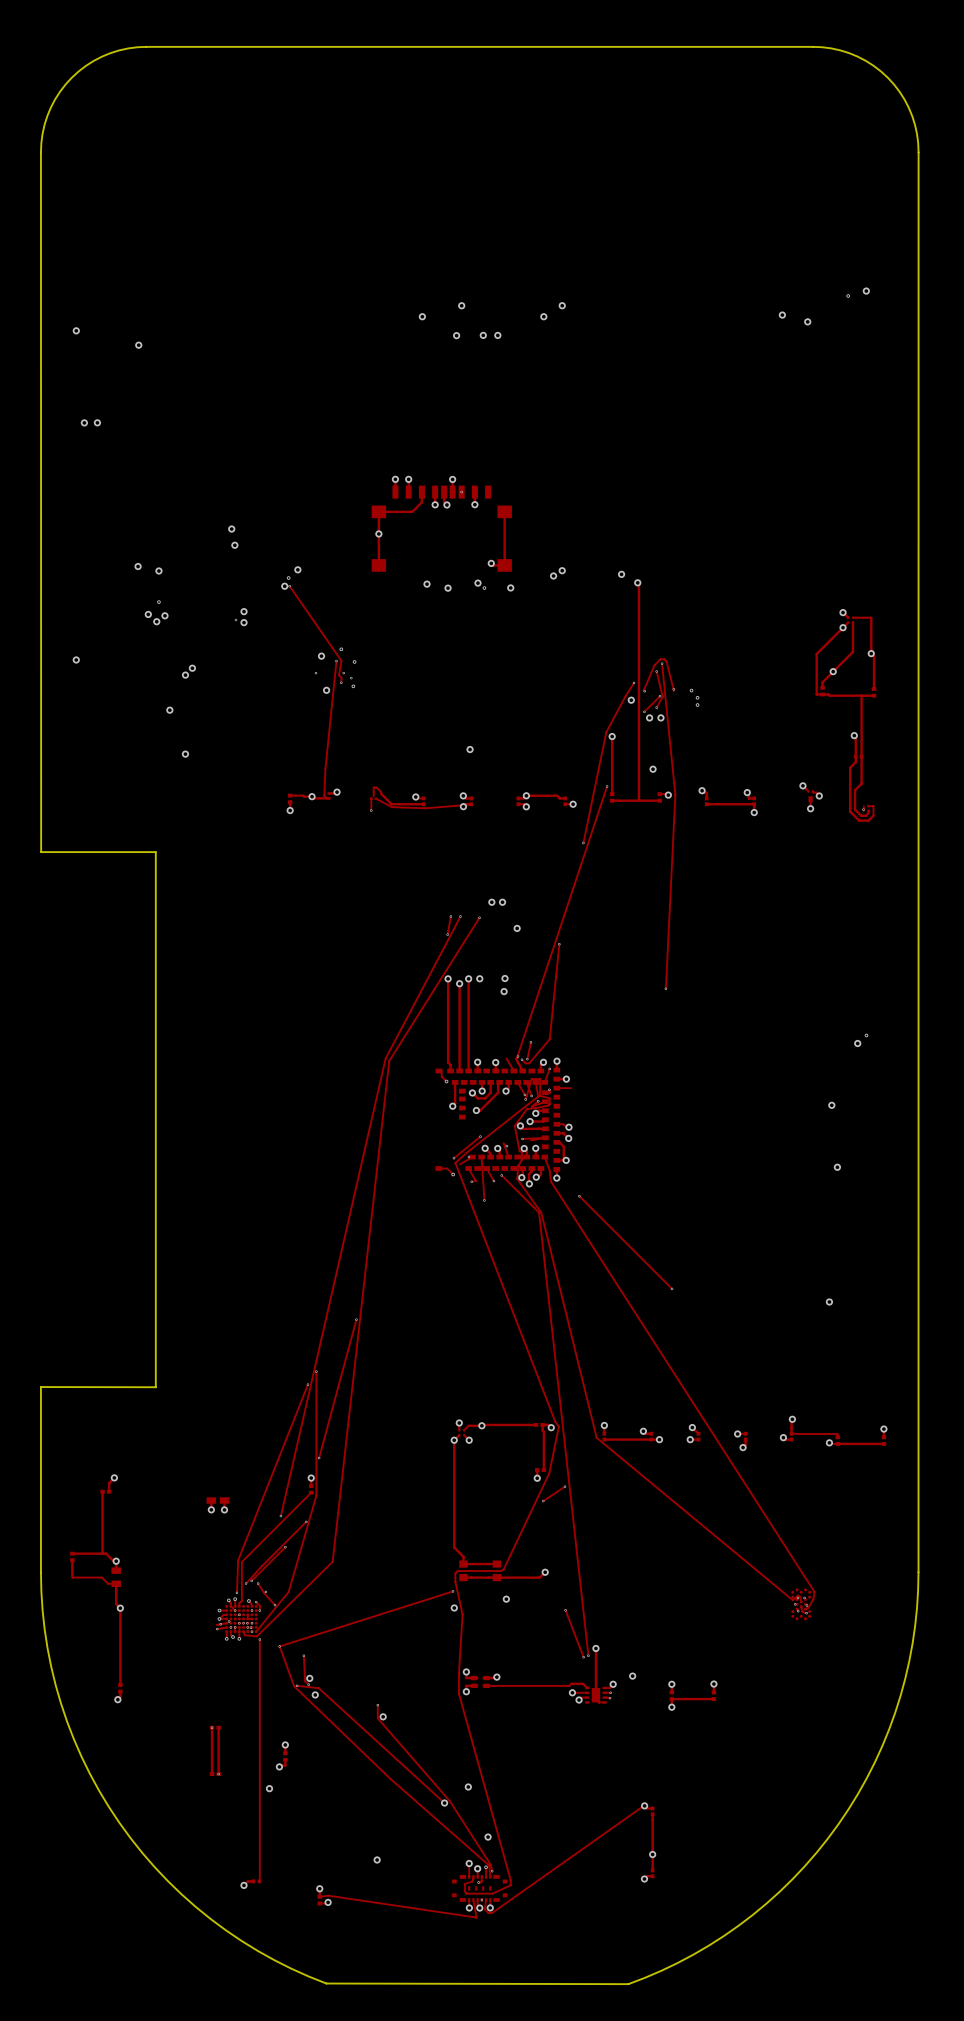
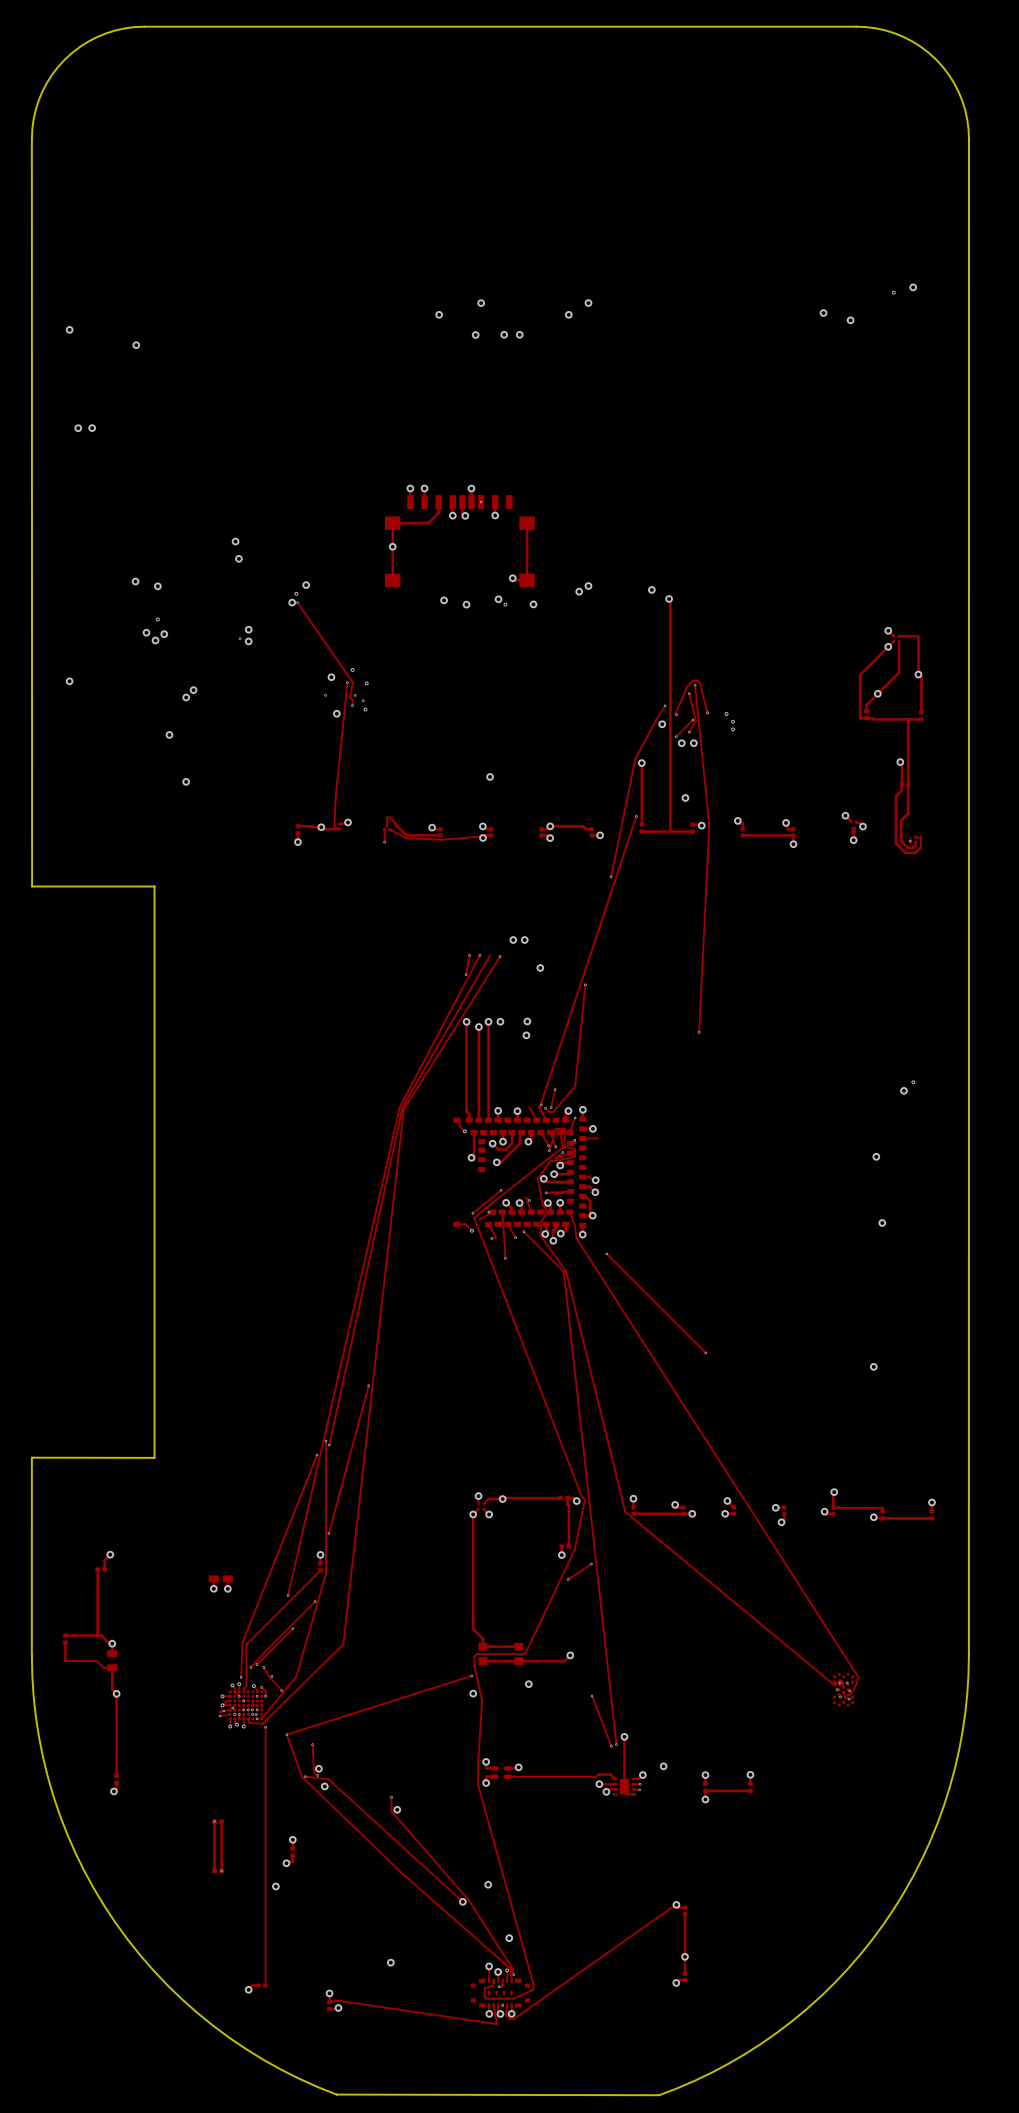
track: none -> (490, 955) (402, 1106) (329, 1445)
via: none -> (329, 1445)

